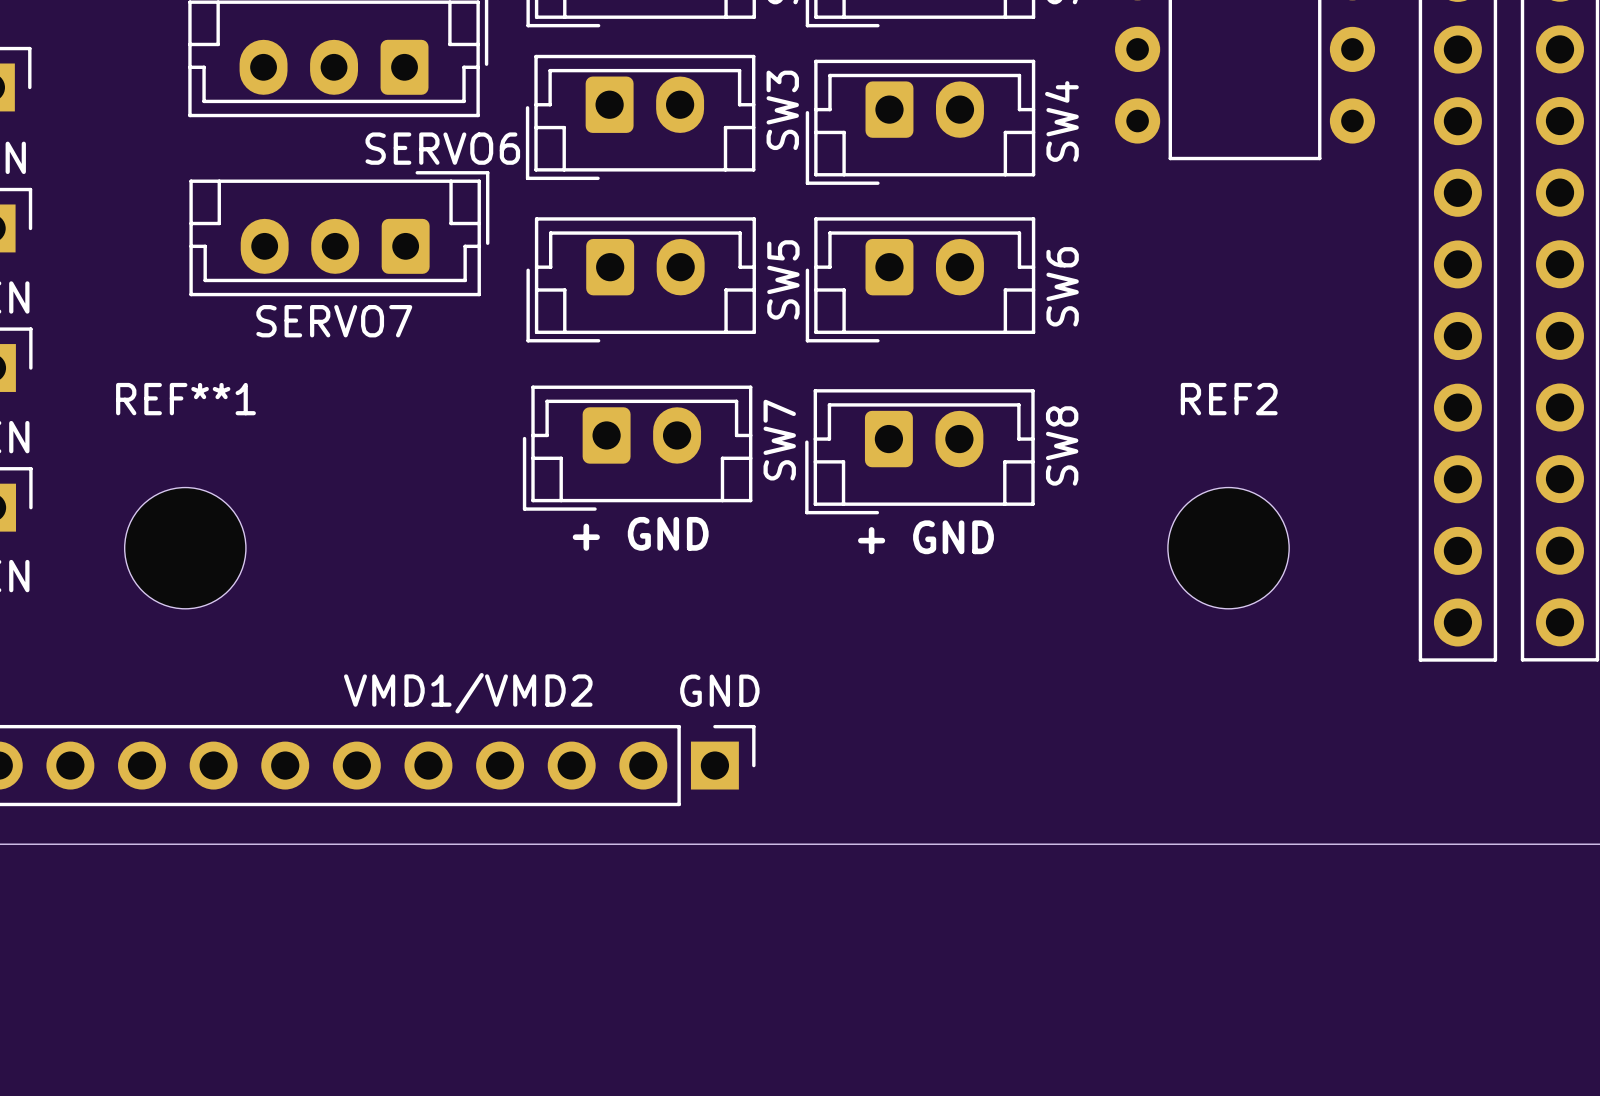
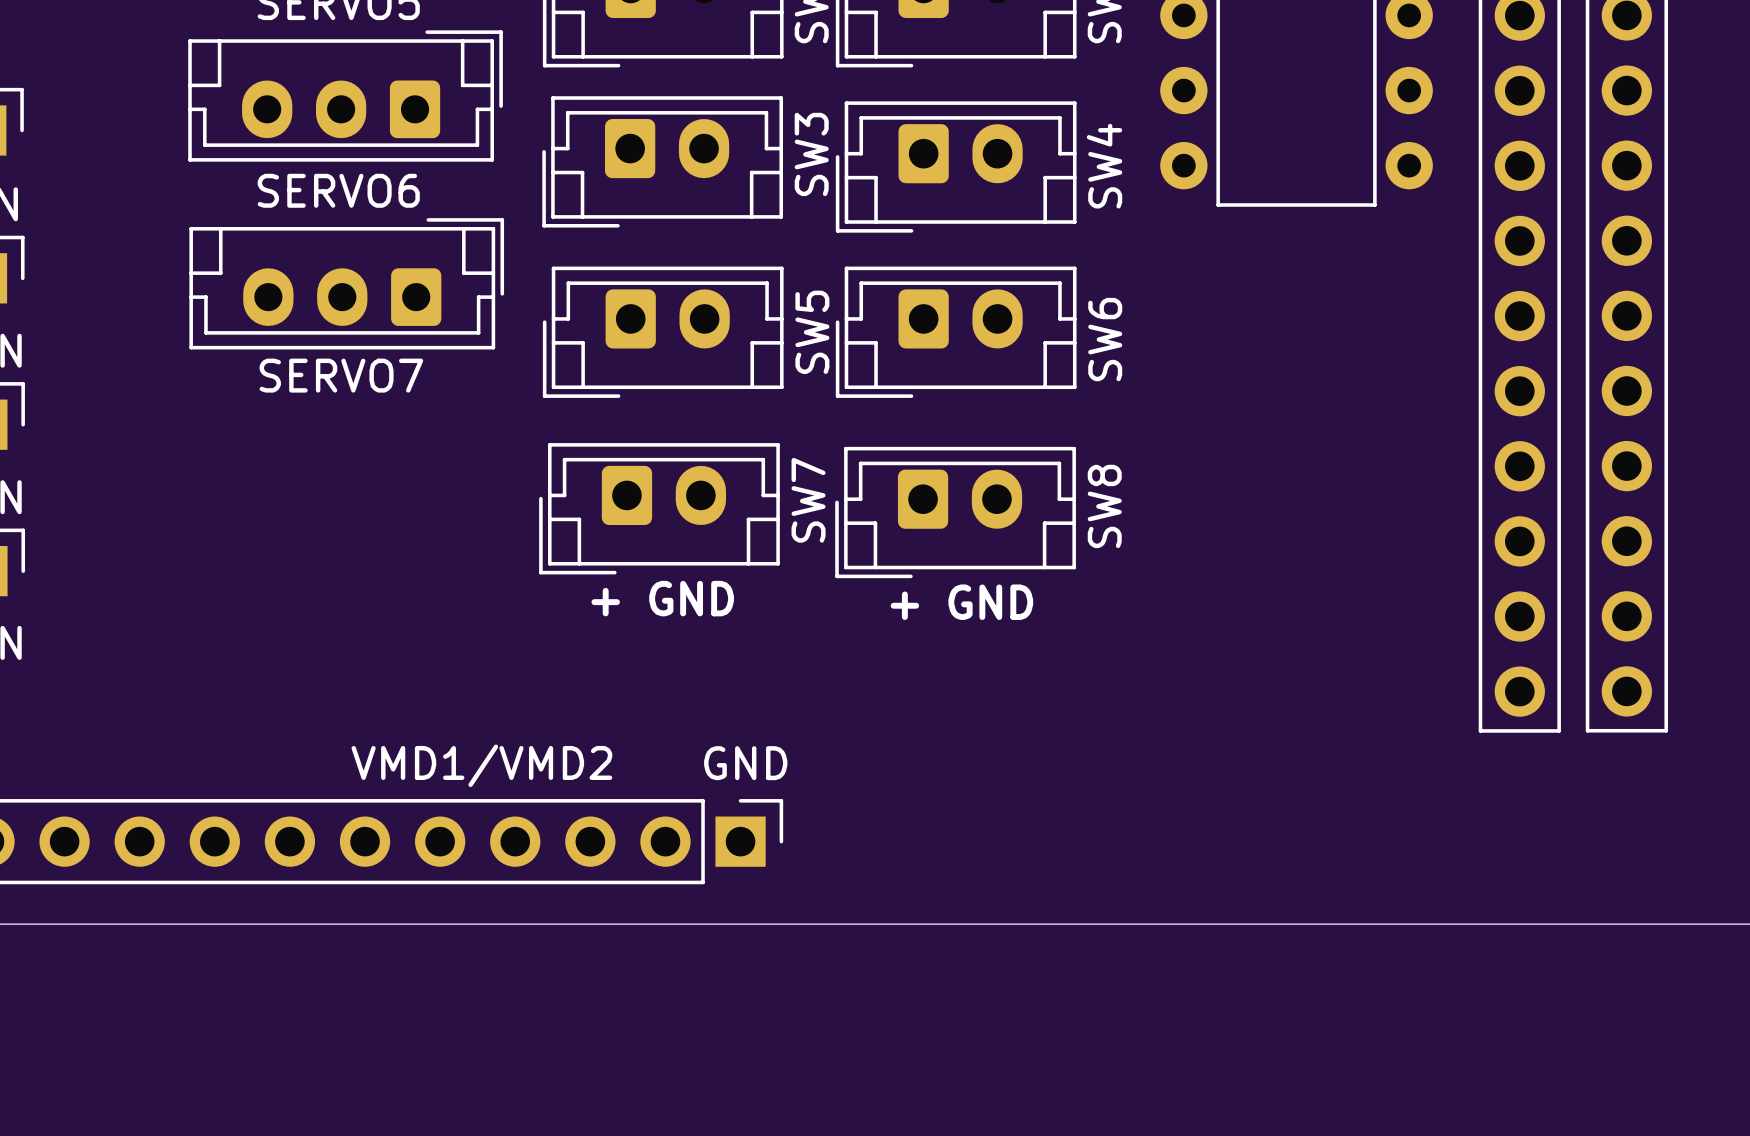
SERVO6 name position: SERVO6 (442, 148) -> SERVO6 (338, 190)
REF**1: (185, 548) -> none
REF2: (1228, 548) -> none

